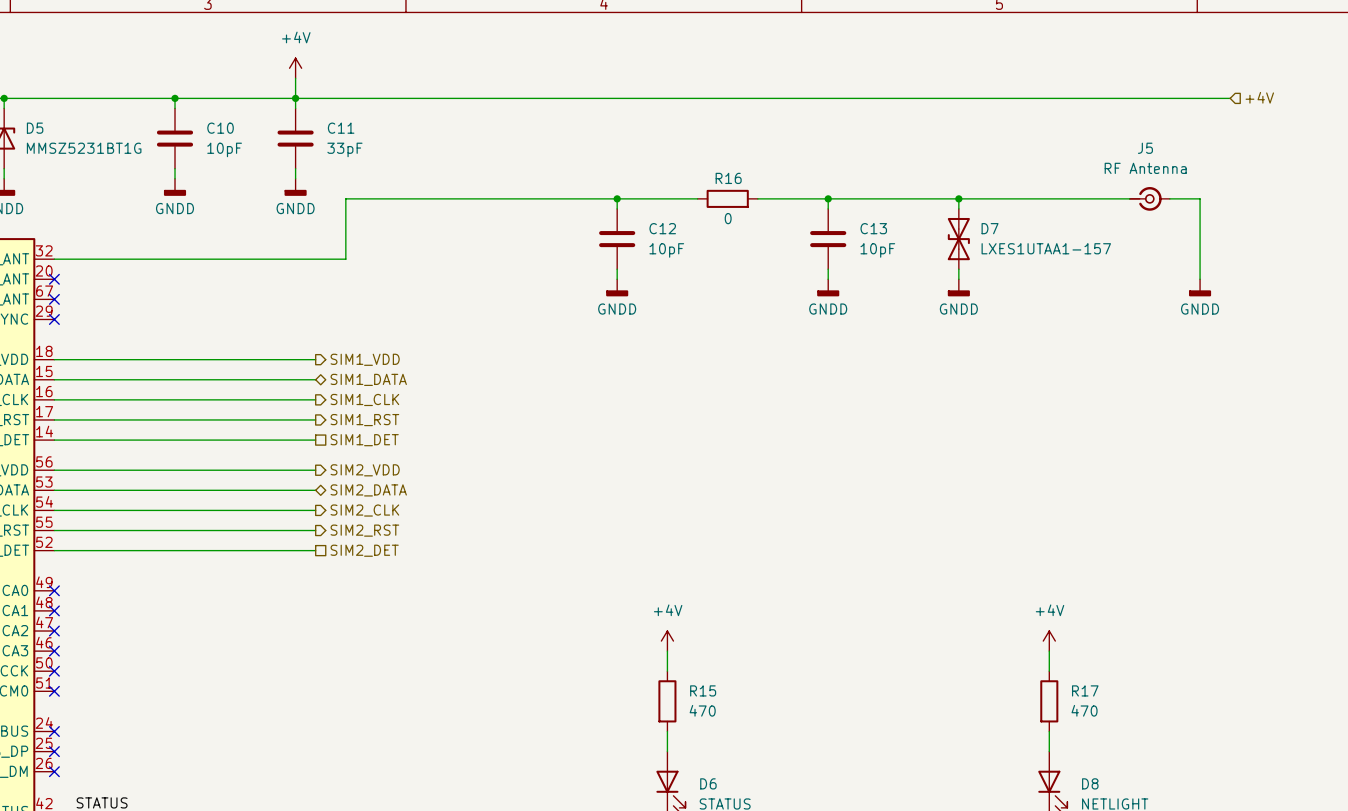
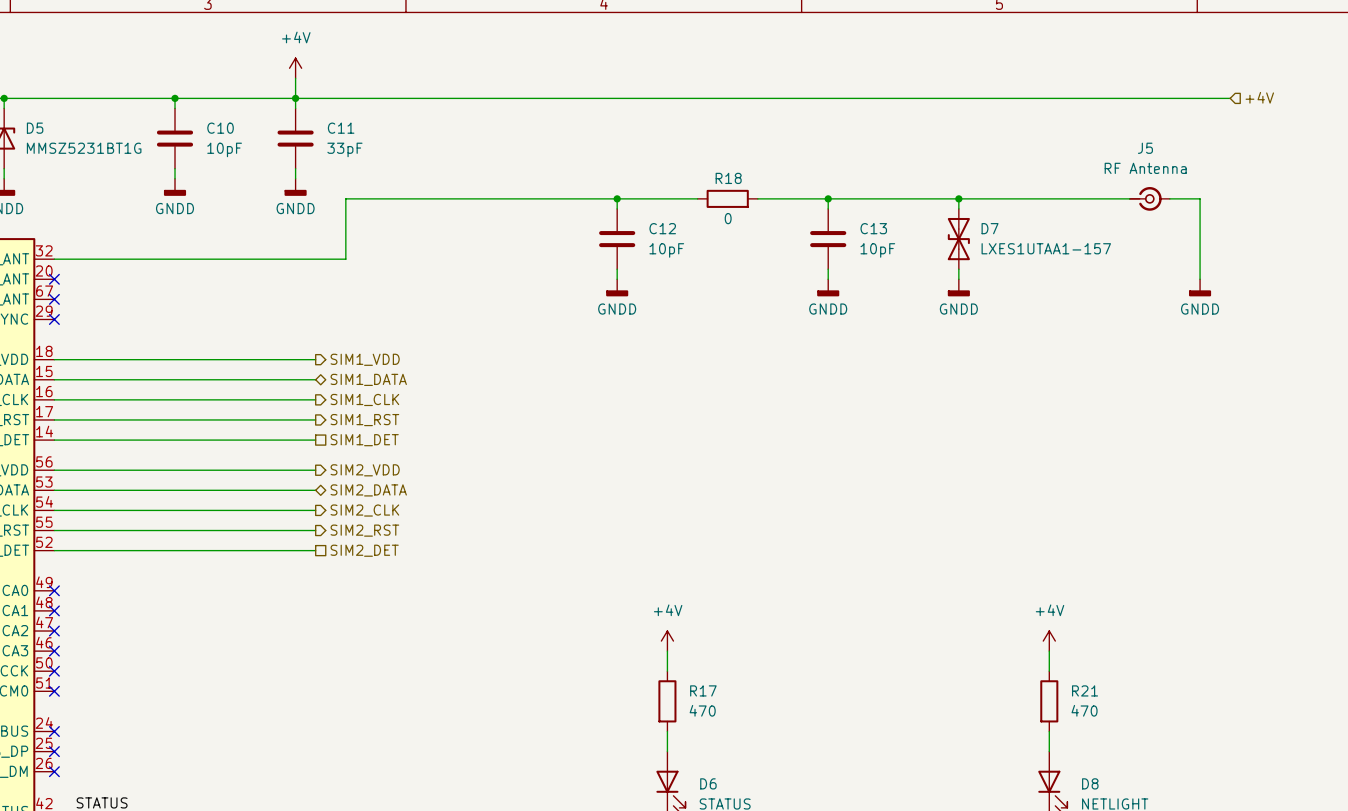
R16 name: R16 (728, 178) -> R18 (728, 178)
R15 name: R15 (703, 690) -> R17 (703, 690)
R17 name: R17 (1085, 690) -> R21 (1085, 690)

